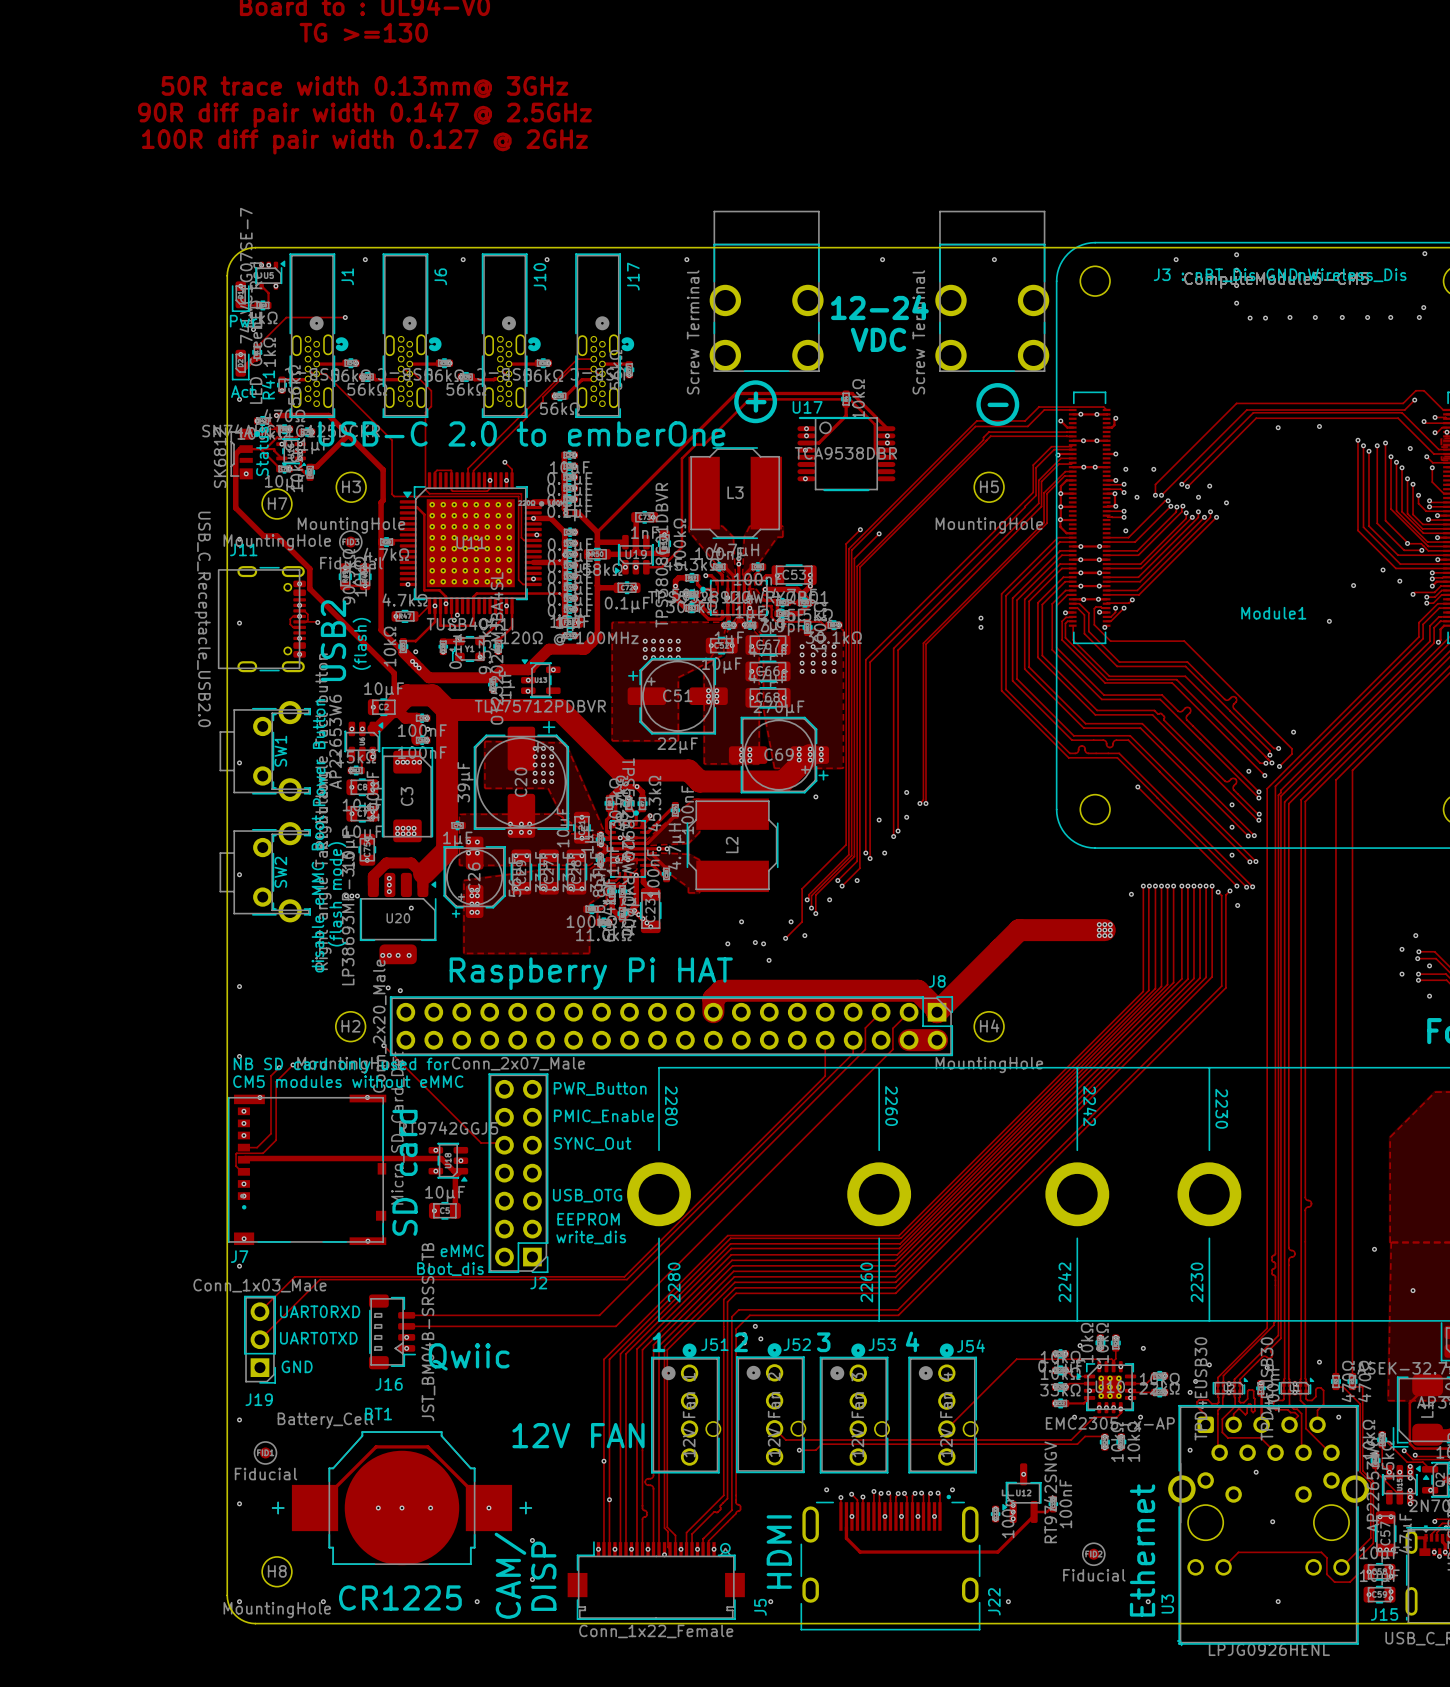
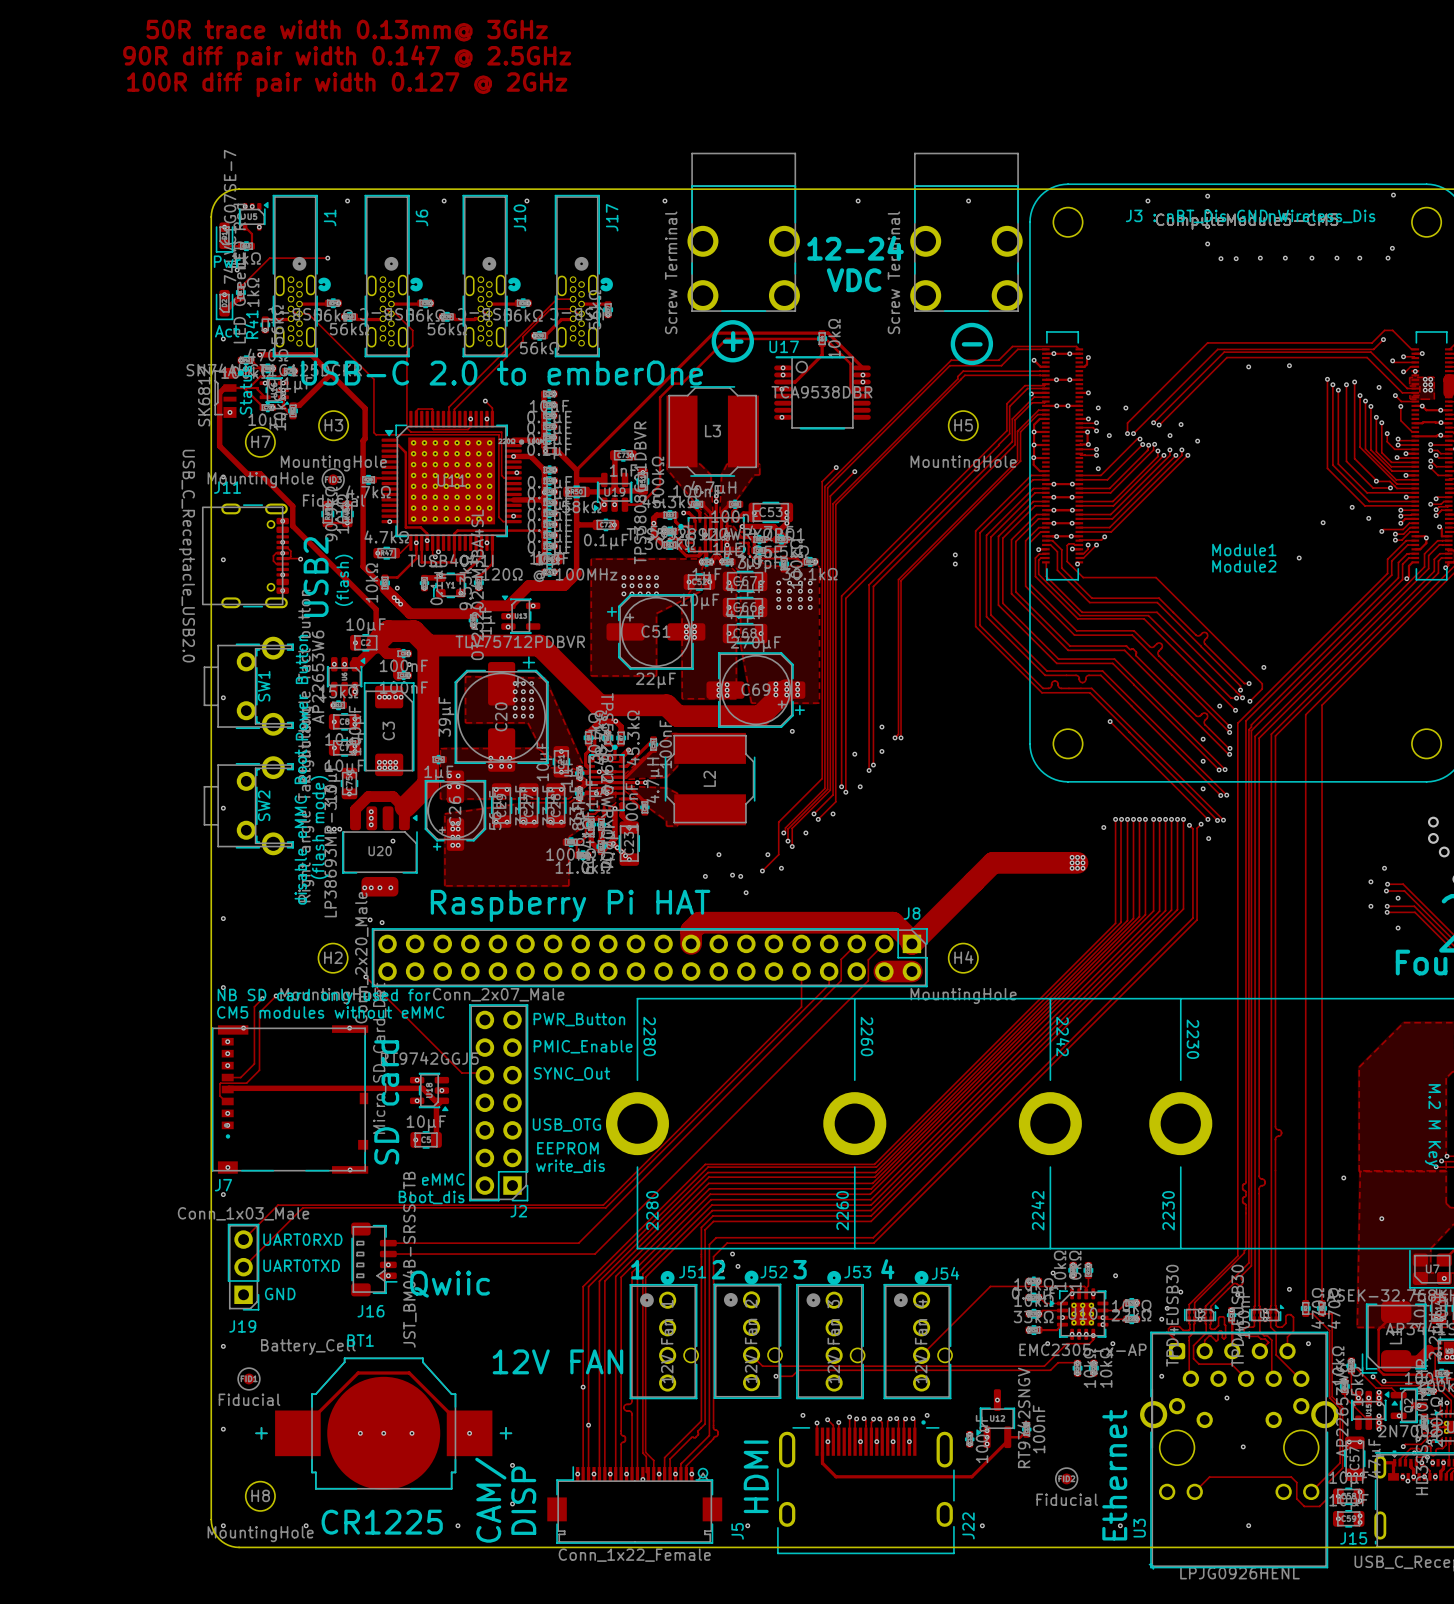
Module2 name: none -> Module2 (1244, 566)

